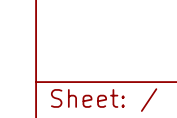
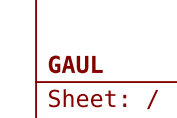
title block: none -> GAUL (75, 64)

